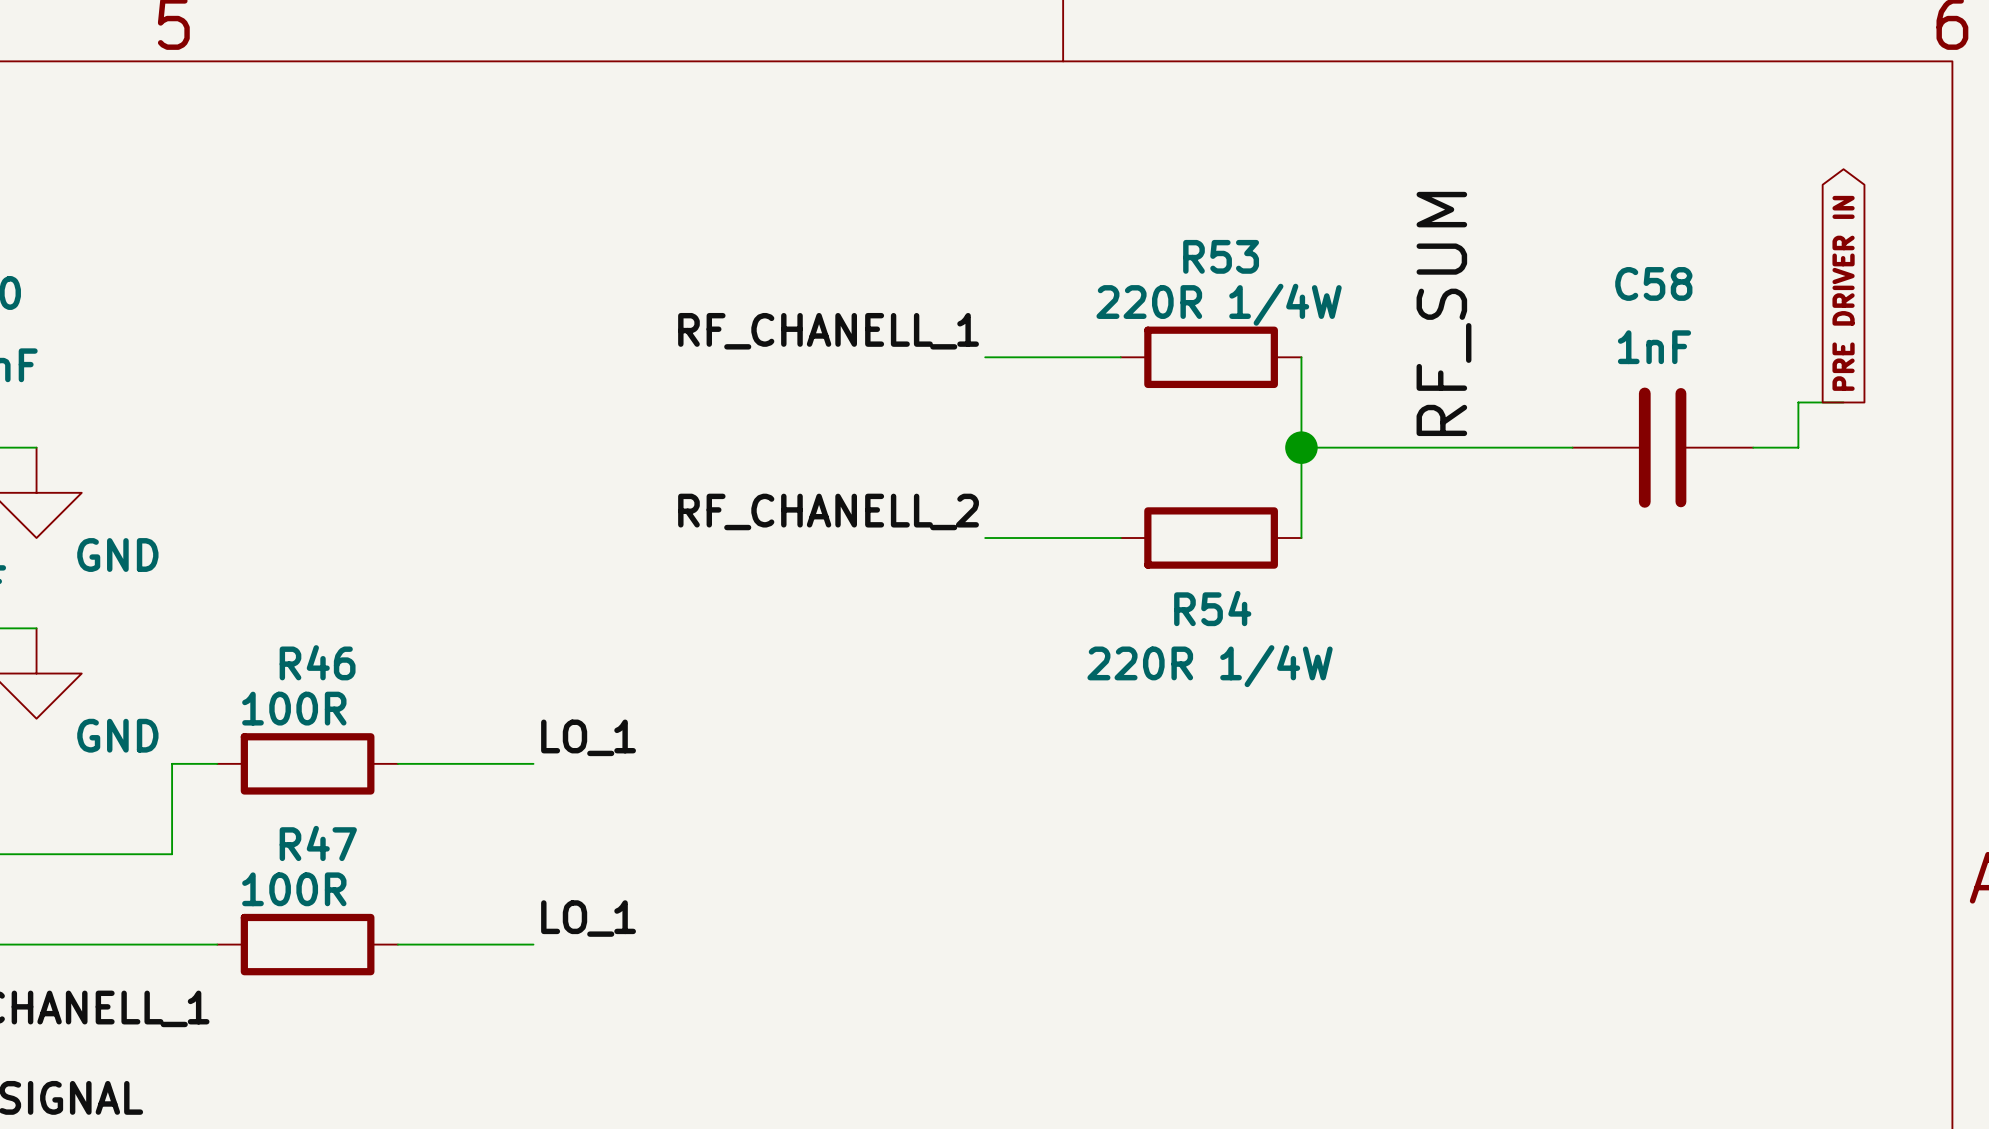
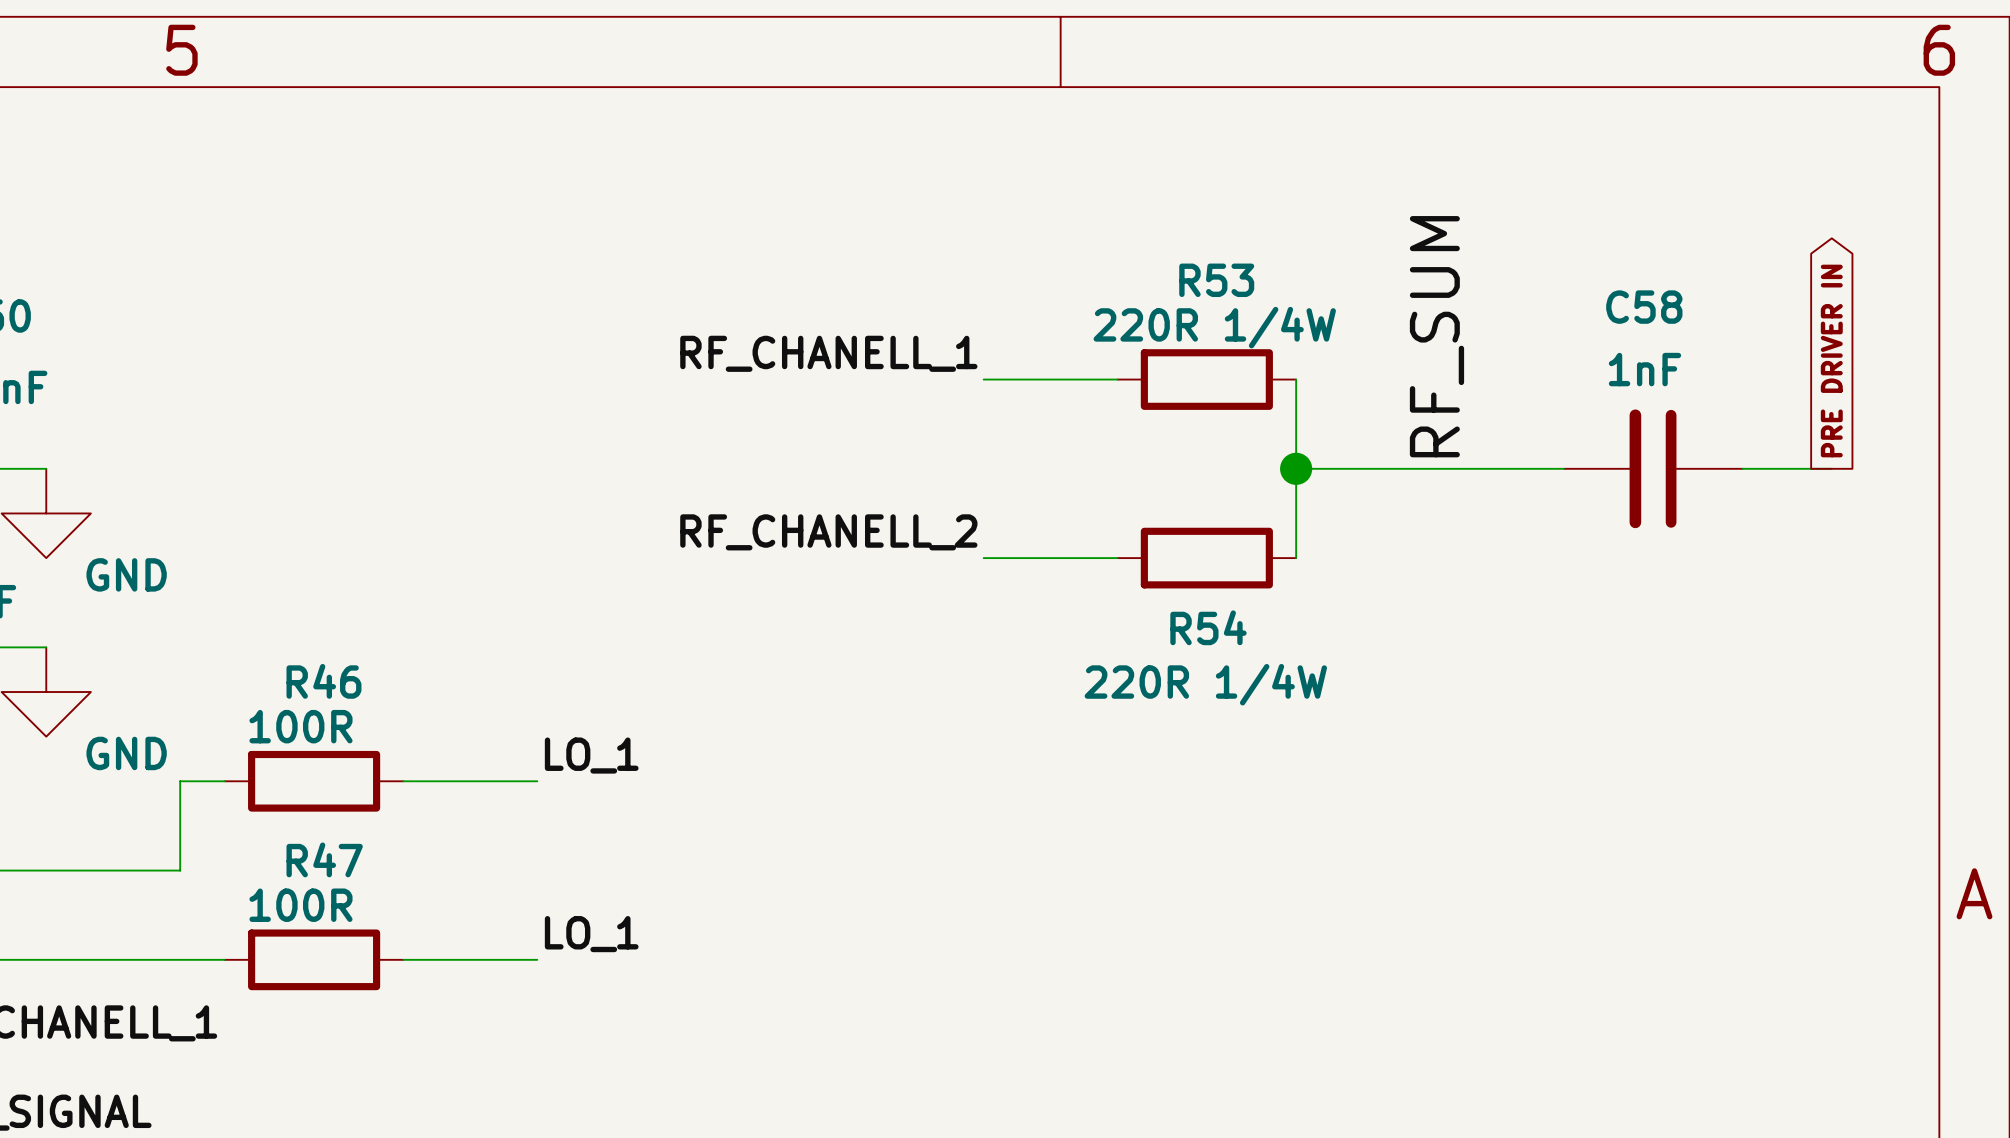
global label position: PRE DRIVER IN (1843, 293) -> PRE DRIVER IN (1831, 361)
wire: (1843, 402) (1798, 402) (1798, 447) -> (1831, 468) (1787, 468)

